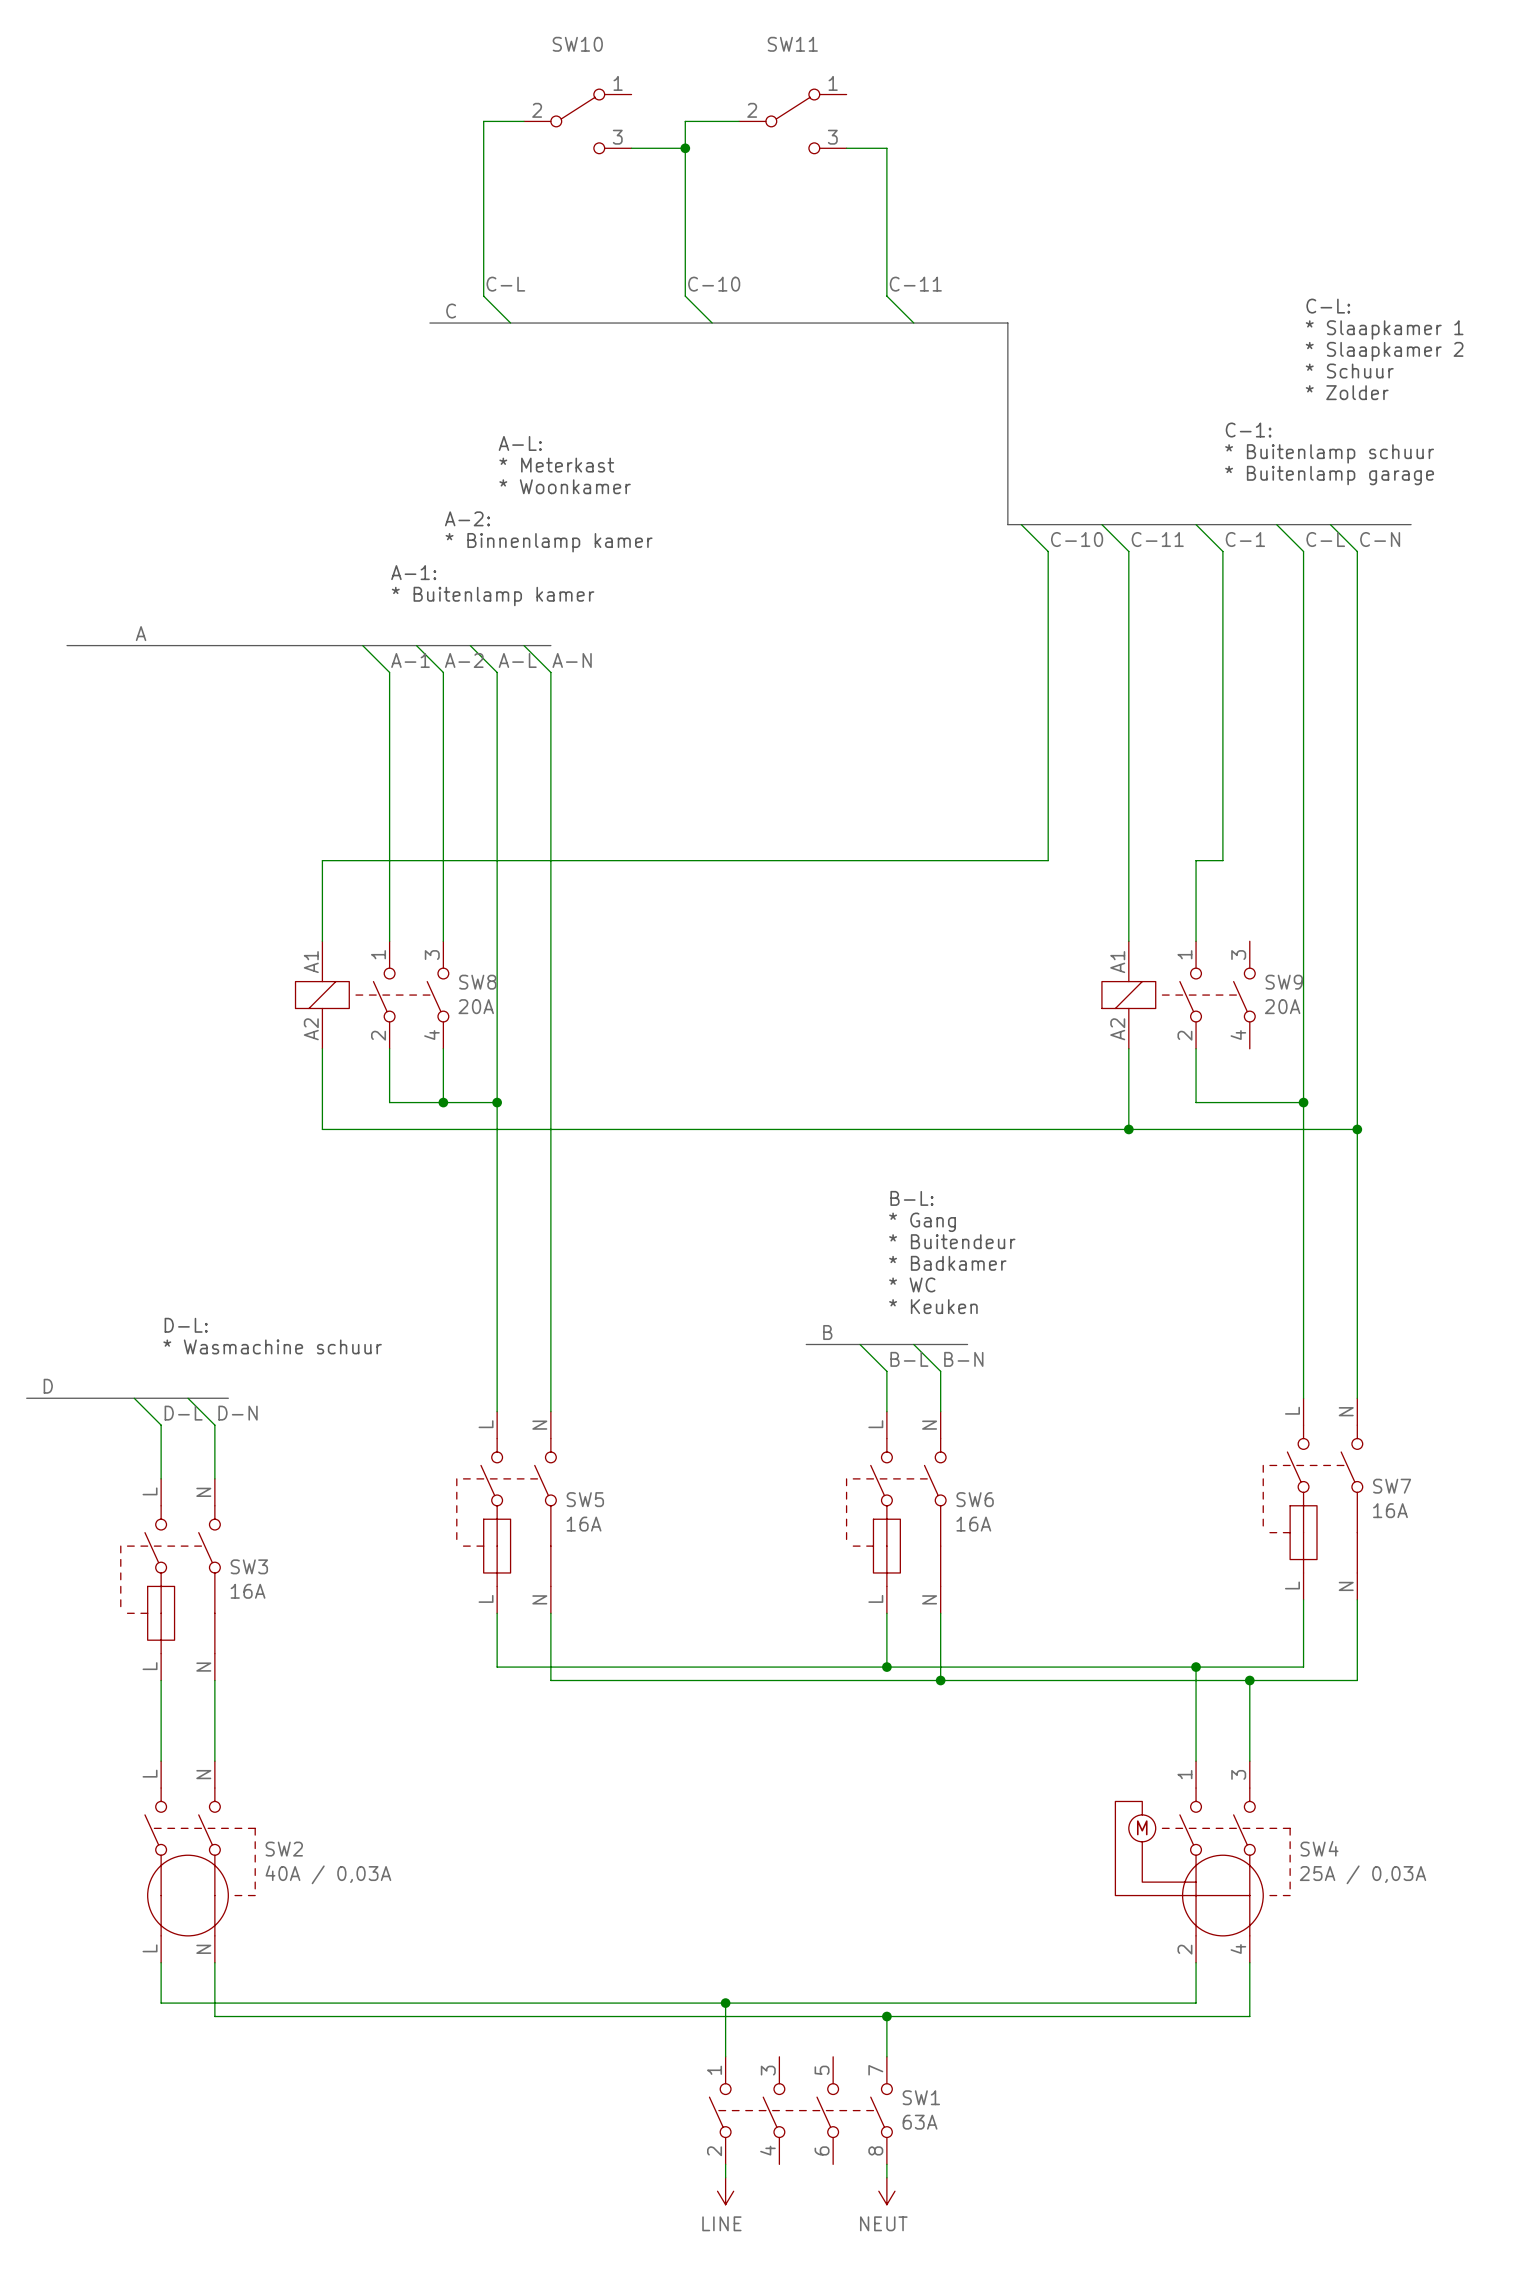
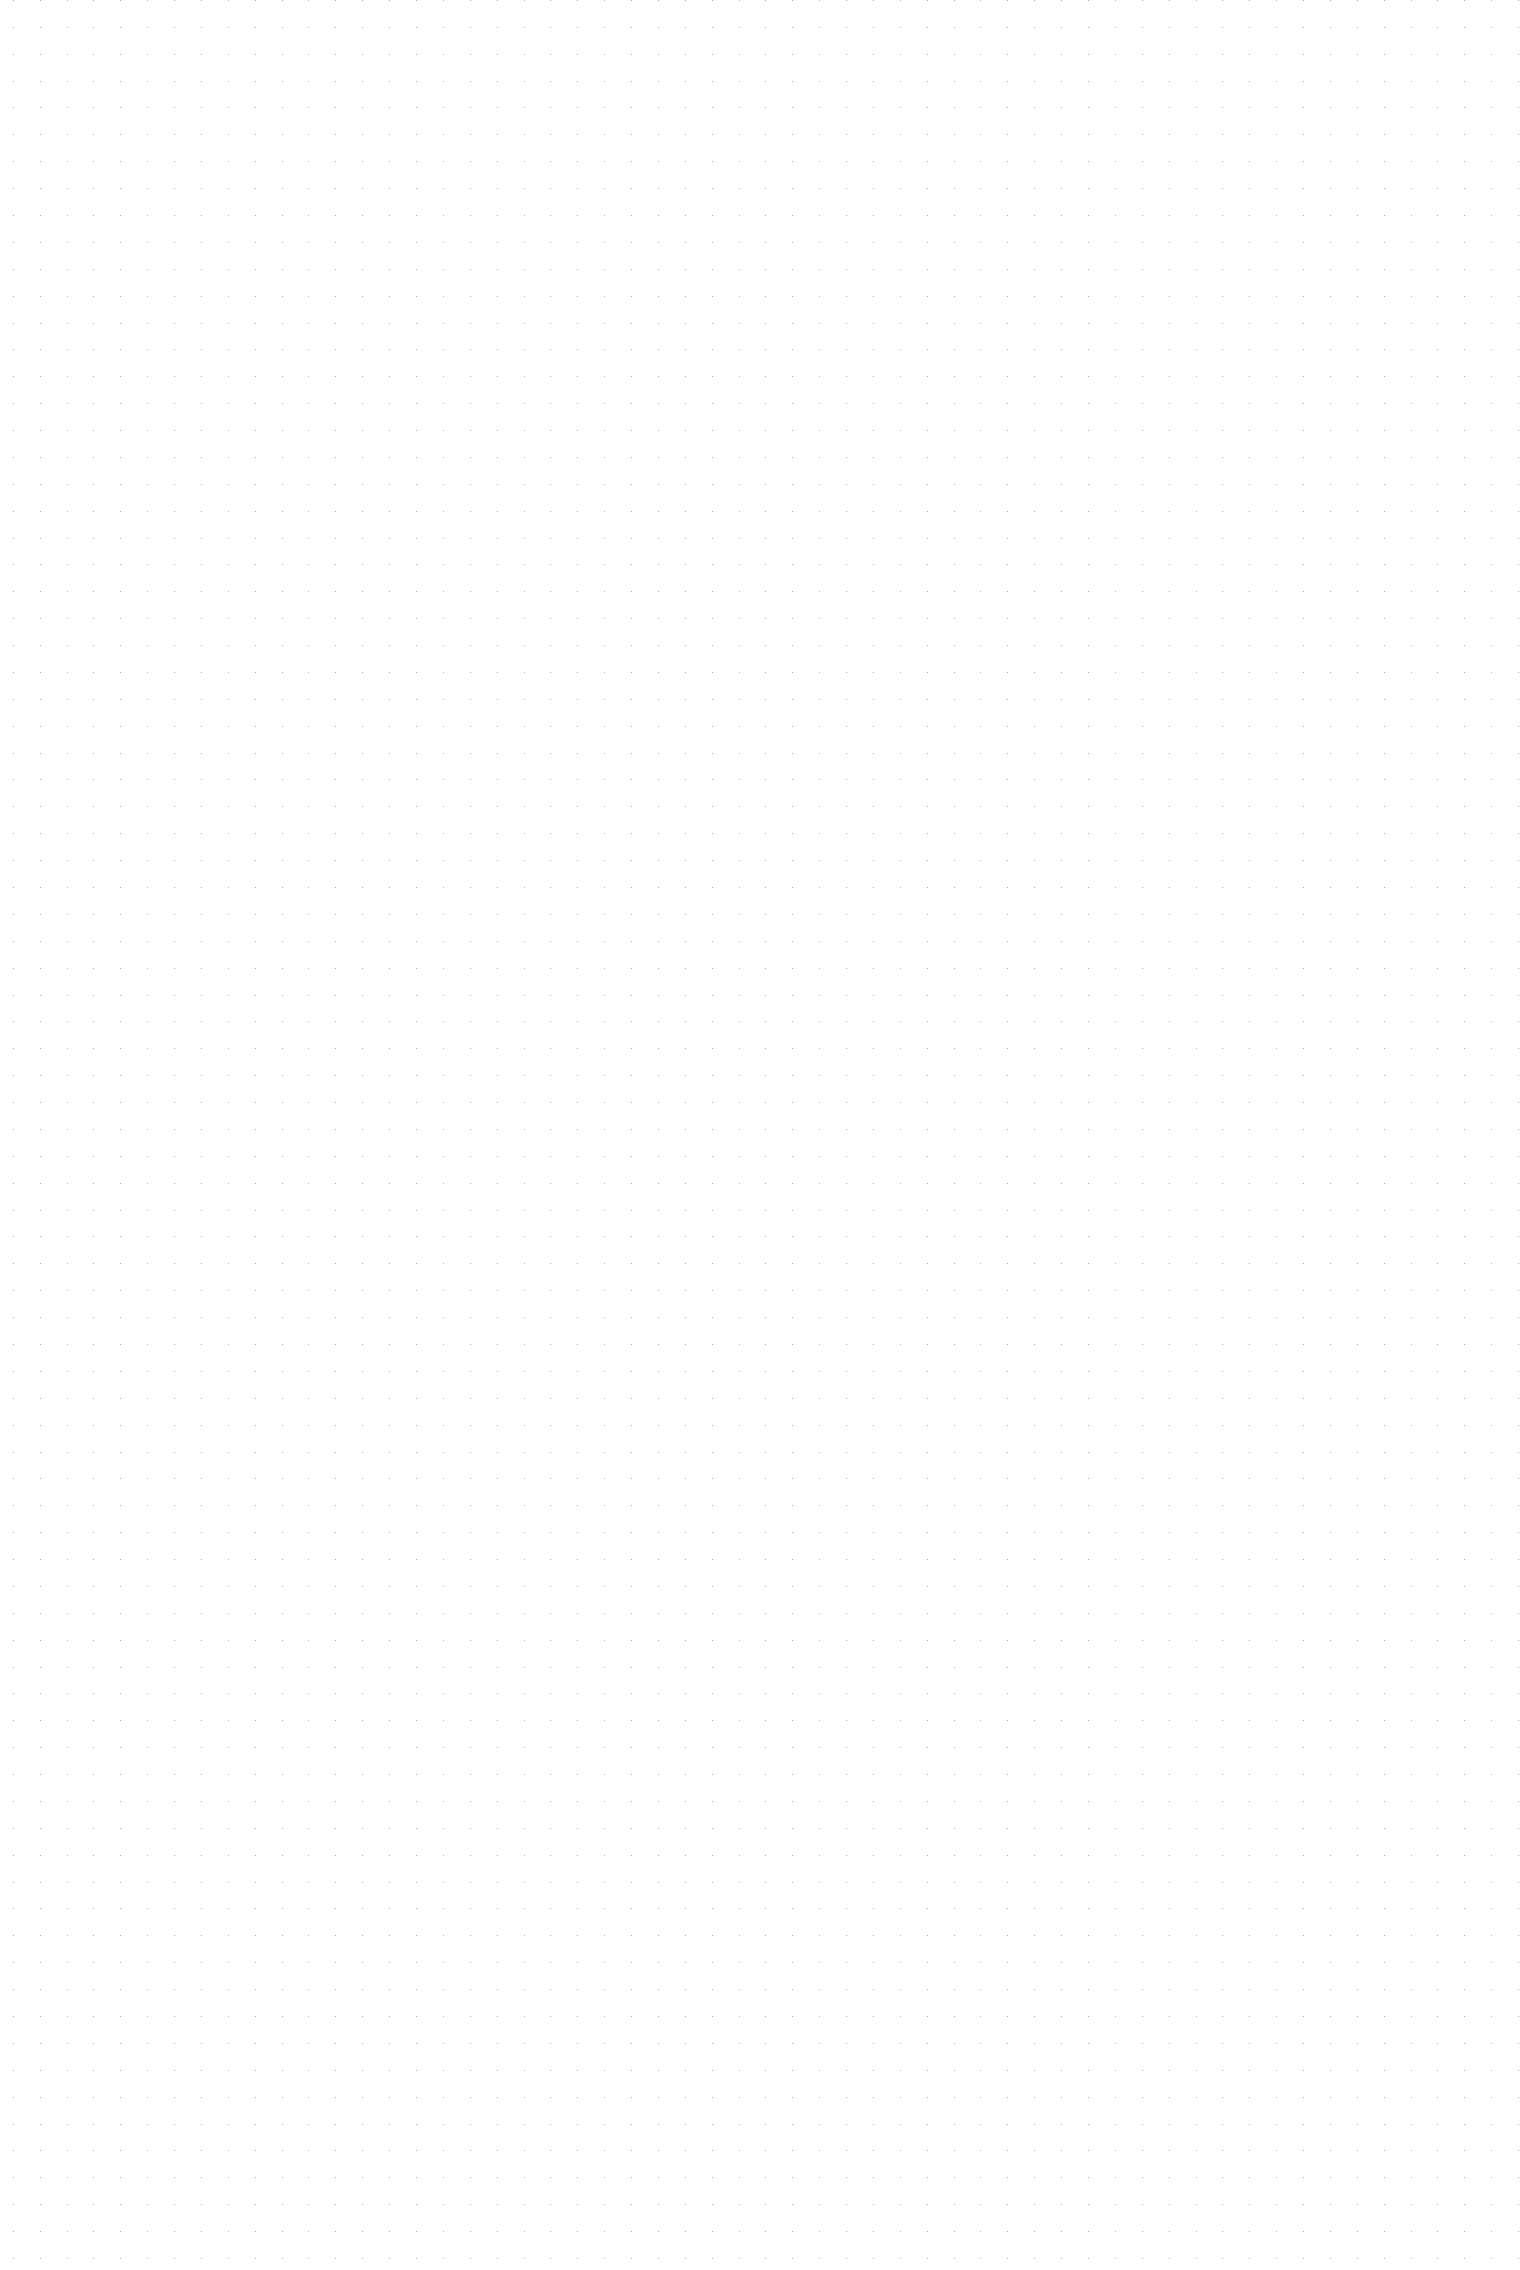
wire: (524, 121) (483, 121) (483, 296) (510, 323) -> none
SW10: (577, 121) -> none
wire: (739, 121) (685, 121) (685, 296) (712, 323) -> none
SW11: (792, 121) -> none
wire: (631, 148) (685, 148) -> none
junction: (685, 148) -> none
wire: (846, 148) (886, 148) (886, 296) (913, 323) -> none
label: C-L (505, 284) -> none
label: C-10 (714, 284) -> none
label: C-11 (915, 284) -> none
text: C-L: (1328, 306) -> none
label: C (451, 311) -> none
bus: (429, 323) (1007, 323) (1007, 524) (1411, 524) -> none
text: * Slaapkamer 1 (1384, 329) -> none
text: * Slaapkamer 2 (1384, 351) -> none
text: * Schuur (1349, 371) -> none
text: * Zolder (1347, 392) -> none
text: C-1: (1248, 430) -> none
text: A-L: (520, 443) -> none
text: * Buitenlamp schuur (1329, 453) -> none
text: * Meterkast (556, 465) -> none
text: * Buitenlamp garage (1329, 475) -> none
text: * Woonkamer (565, 486) -> none
text: A-2: (467, 518) -> none
wire: (1021, 524) (1048, 551) (1048, 860) (322, 860) (322, 941) -> none
wire: (1101, 524) (1128, 551) (1128, 941) -> none
wire: (1196, 524) (1222, 551) (1222, 860) (1196, 860) (1196, 941) -> none
wire: (1276, 524) (1303, 551) (1303, 1398) -> none
wire: (1330, 524) (1357, 551) (1357, 1398) -> none
label: C-10 (1077, 539) -> none
label: C-11 (1157, 539) -> none
label: C-1 (1245, 539) -> none
label: C-L (1325, 539) -> none
label: C-N (1380, 539) -> none
text: * Binnenlamp kamer (549, 542) -> none
text: A-1: (413, 572) -> none
text: * Buitenlamp kamer (493, 596) -> none
label: A (141, 633) -> none
bus: (67, 645) (550, 645) -> none
wire: (362, 645) (389, 672) (389, 941) -> none
wire: (416, 645) (443, 672) (443, 941) -> none
wire: (470, 645) (497, 672) (497, 1411) -> none
wire: (524, 645) (550, 672) (550, 1411) -> none
label: A-1 (410, 660) -> none
label: A-2 (464, 660) -> none
label: A-L (517, 660) -> none
label: A-N (572, 660) -> none
SW8: 20A (372, 995) -> none
SW9: 20A (1178, 995) -> none
wire: (322, 1048) (322, 1129) (1357, 1129) -> none
wire: (389, 1048) (389, 1102) (497, 1102) -> none
wire: (443, 1048) (443, 1102) -> none
wire: (1128, 1048) (1128, 1129) -> none
wire: (1196, 1048) (1196, 1102) (1303, 1102) -> none
junction: (443, 1102) -> none
junction: (497, 1102) -> none
junction: (1303, 1102) -> none
junction: (1128, 1129) -> none
junction: (1357, 1129) -> none
text: B-L: (911, 1198) -> none
text: * Gang (922, 1222) -> none
text: * Buitendeur (952, 1241) -> none
text: * Badkamer (947, 1263) -> none
text: * WC (912, 1284) -> none
text: * Keuken (933, 1306) -> none
text: D-L: (186, 1325) -> none
label: B (827, 1332) -> none
bus: (806, 1344) (967, 1344) -> none
wire: (860, 1344) (886, 1371) (886, 1411) -> none
wire: (913, 1344) (940, 1371) (940, 1411) -> none
text: * Wasmachine schuur (272, 1346) -> none
label: B-L (909, 1359) -> none
label: B-N (963, 1359) -> none
label: D (48, 1386) -> none
bus: (26, 1398) (228, 1398) -> none
wire: (134, 1398) (161, 1425) (161, 1478) -> none
wire: (188, 1398) (214, 1425) (214, 1478) -> none
label: D-L (183, 1413) -> none
label: D-N (238, 1413) -> none
SW7: 16A (1312, 1499) -> none
SW5: 16A (506, 1512) -> none
SW6: 16A (896, 1512) -> none
SW3: 16A (170, 1579) -> none
wire: (1303, 1599) (1303, 1667) (497, 1667) (497, 1613) -> none
wire: (1357, 1599) (1357, 1680) (550, 1680) (550, 1613) -> none
wire: (886, 1613) (886, 1667) -> none
wire: (940, 1613) (940, 1680) -> none
junction: (886, 1667) -> none
wire: (1196, 1667) (1196, 1761) -> none
junction: (1196, 1667) -> none
wire: (161, 1680) (161, 1761) -> none
wire: (214, 1680) (214, 1761) -> none
junction: (940, 1680) -> none
wire: (1249, 1680) (1249, 1761) -> none
junction: (1249, 1680) -> none
SW2: 40A / 0,03A (200, 1861) -> none
SW4: 25A / 0,03A (1202, 1861) -> none
wire: (161, 1962) (161, 2003) (1196, 2003) (1196, 1962) -> none
wire: (214, 1962) (214, 2016) (1249, 2016) (1249, 1962) -> none
wire: (725, 2003) (725, 2056) -> none
junction: (725, 2003) -> none
wire: (886, 2016) (886, 2056) -> none
junction: (886, 2016) -> none
SW1: 63A (800, 2110) -> none
wire: (725, 2164) (725, 2177) -> none
wire: (886, 2164) (886, 2177) -> none
power symbol: LINE (725, 2191) -> none
power symbol: NEUT (886, 2191) -> none

